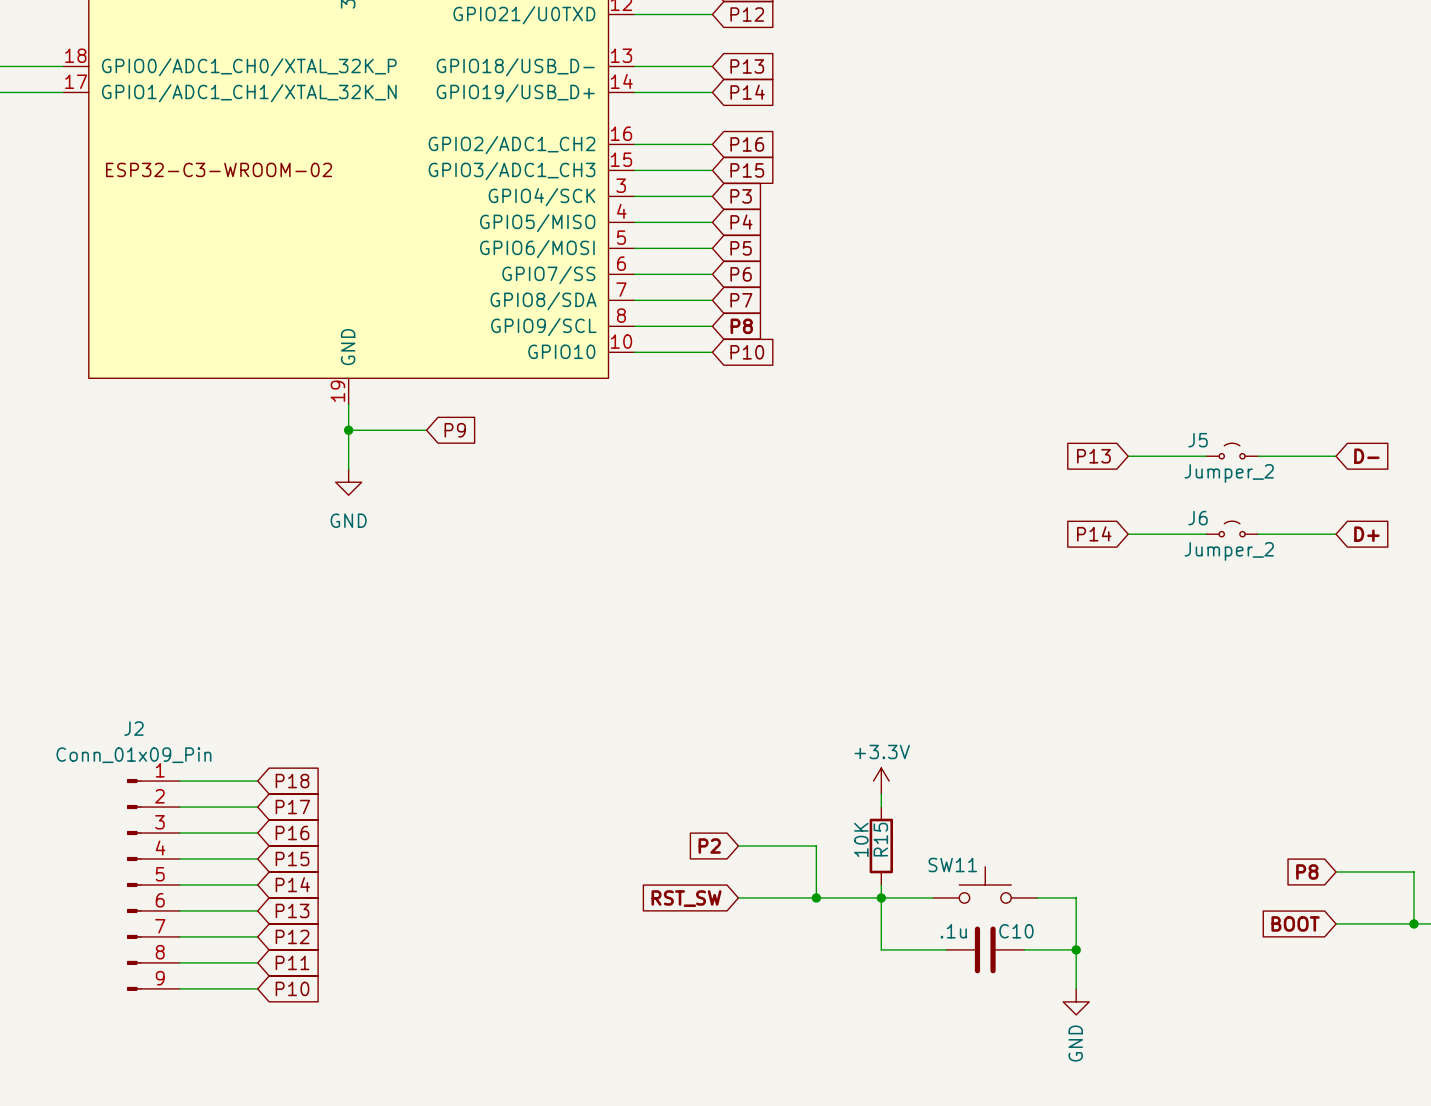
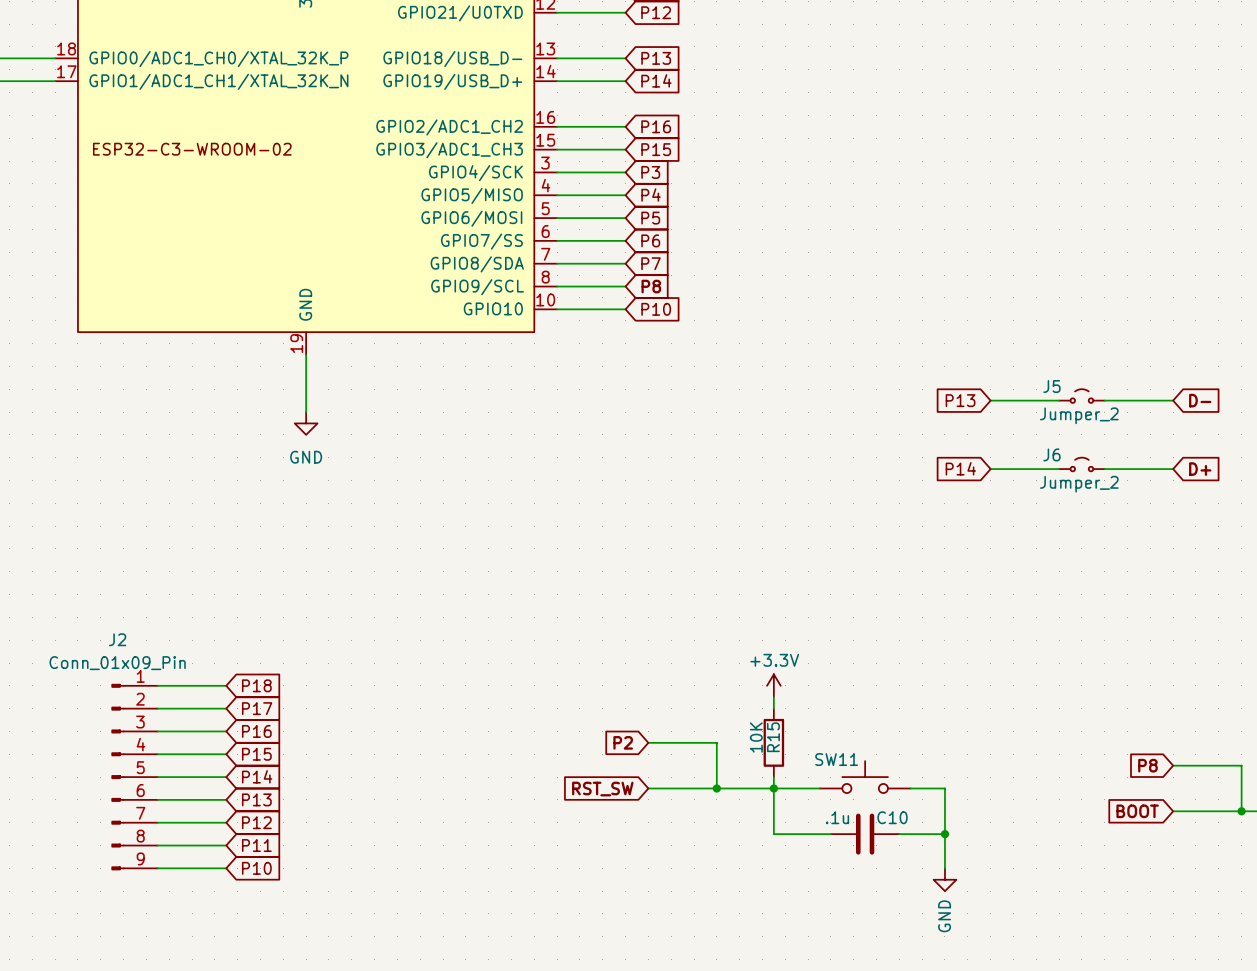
wire: (348, 430) (426, 430) -> none
junction: (348, 430) -> none
global label: P9 (455, 430) -> none

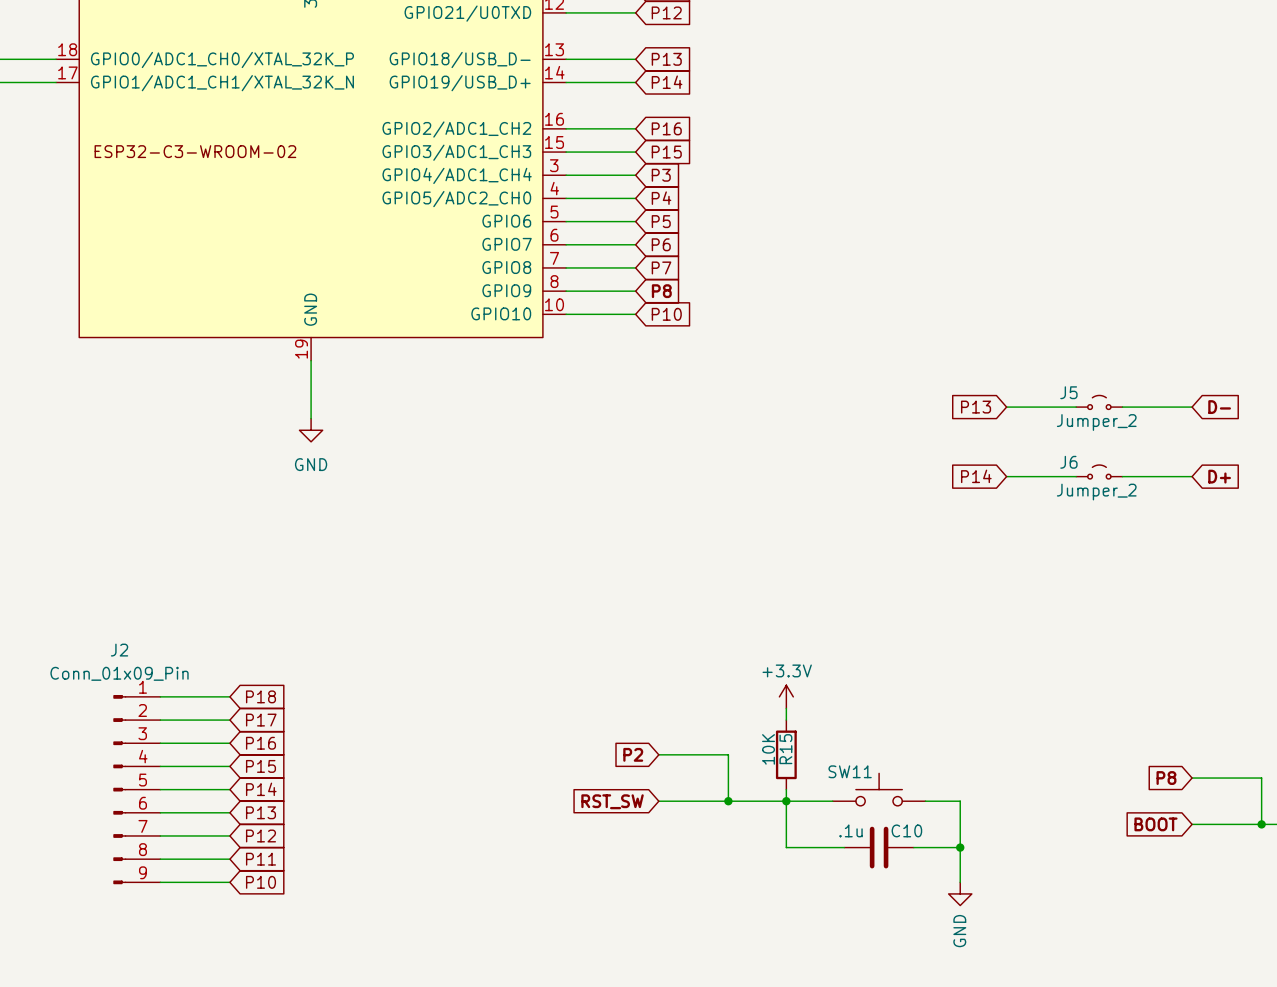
part pin name: GPIO4/SCK (475, 173) -> GPIO4/ADC1_CH4 (457, 175)
part pin name: GPIO5/MISO (472, 195) -> GPIO5/ADC2_CH0 (456, 199)
part pin name: GPIO6/MOSI (471, 218) -> GPIO6 (506, 221)
part pin name: GPIO7/SS (481, 241) -> GPIO7 (507, 244)
part pin name: GPIO8/SDA (477, 264) -> GPIO8 (506, 267)
part pin name: GPIO9/SCL (477, 287) -> GPIO9 (506, 290)

